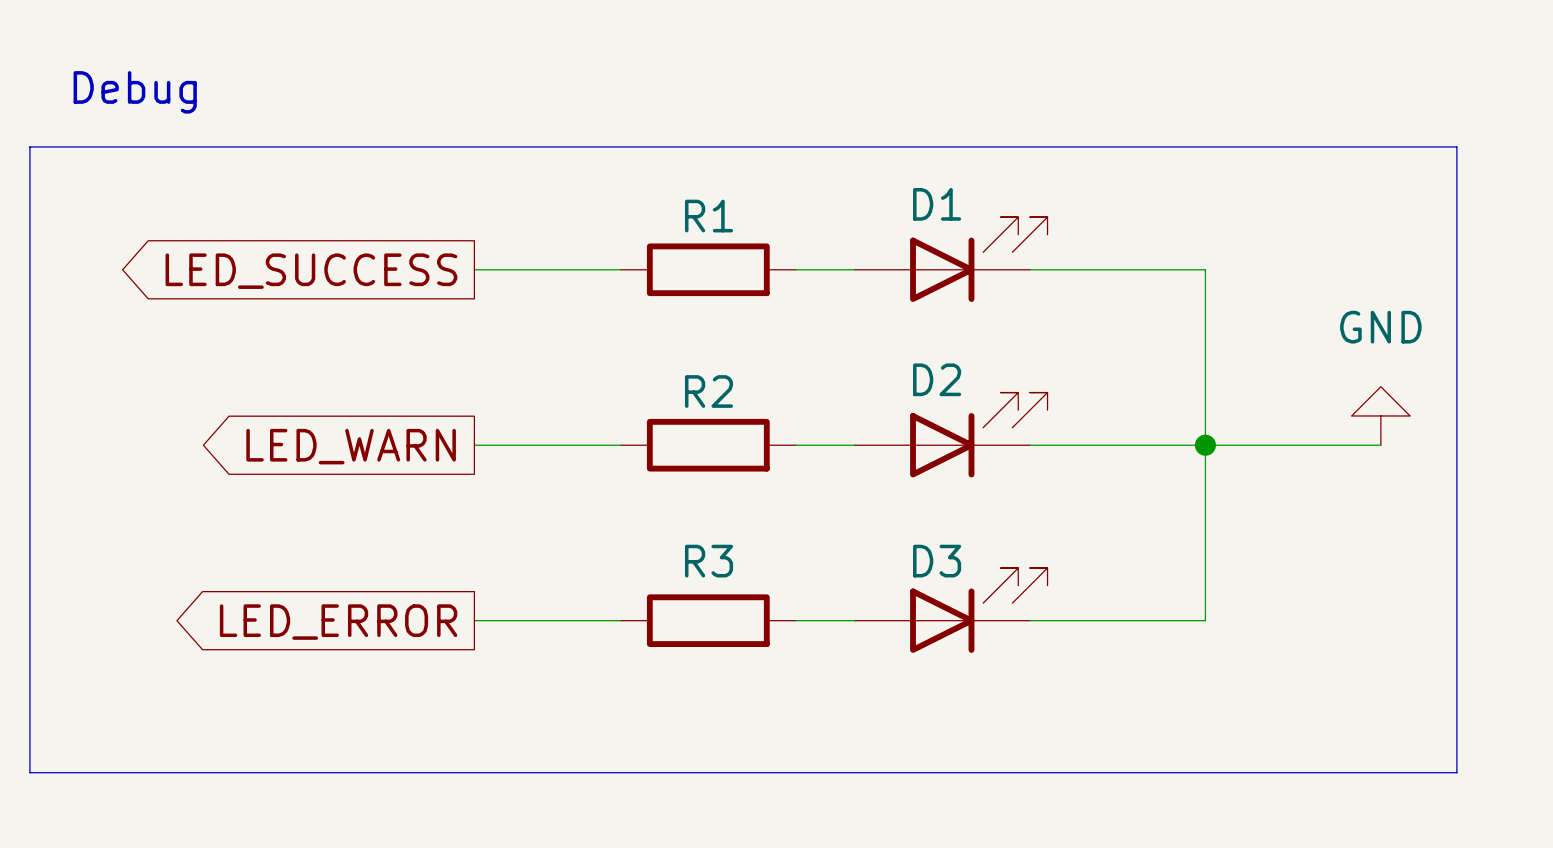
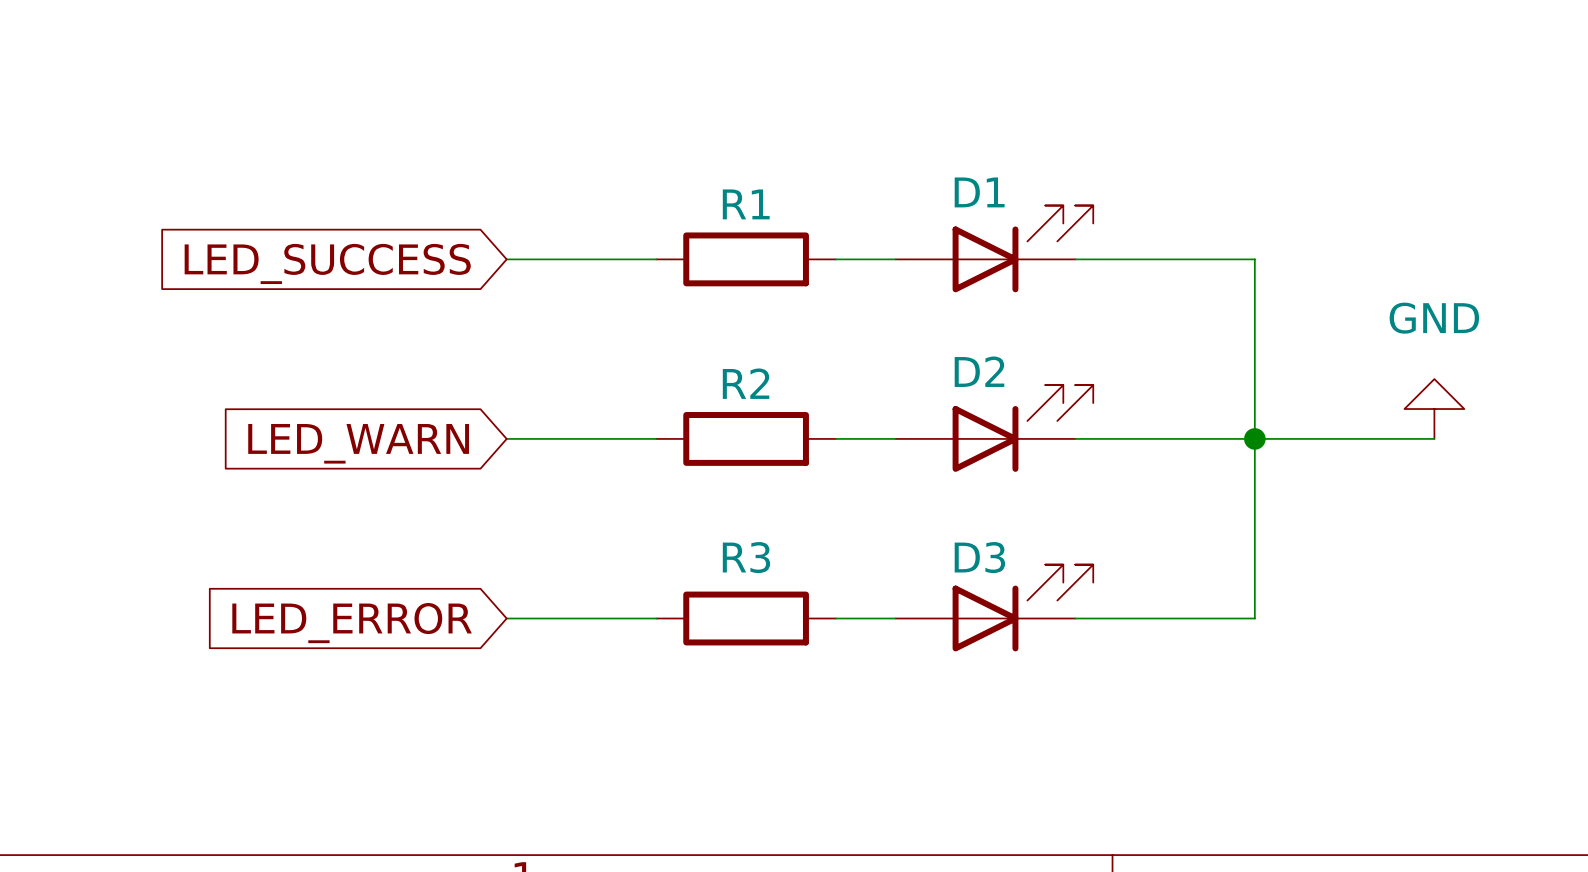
text: Debug (135, 92) -> none
line: (29, 146) (1456, 146) (1456, 772) (29, 772) (29, 146) -> none
global label shape: output (311, 271) -> input (327, 263)
global label shape: output (351, 446) -> input (358, 443)
global label shape: output (338, 622) -> input (352, 623)

